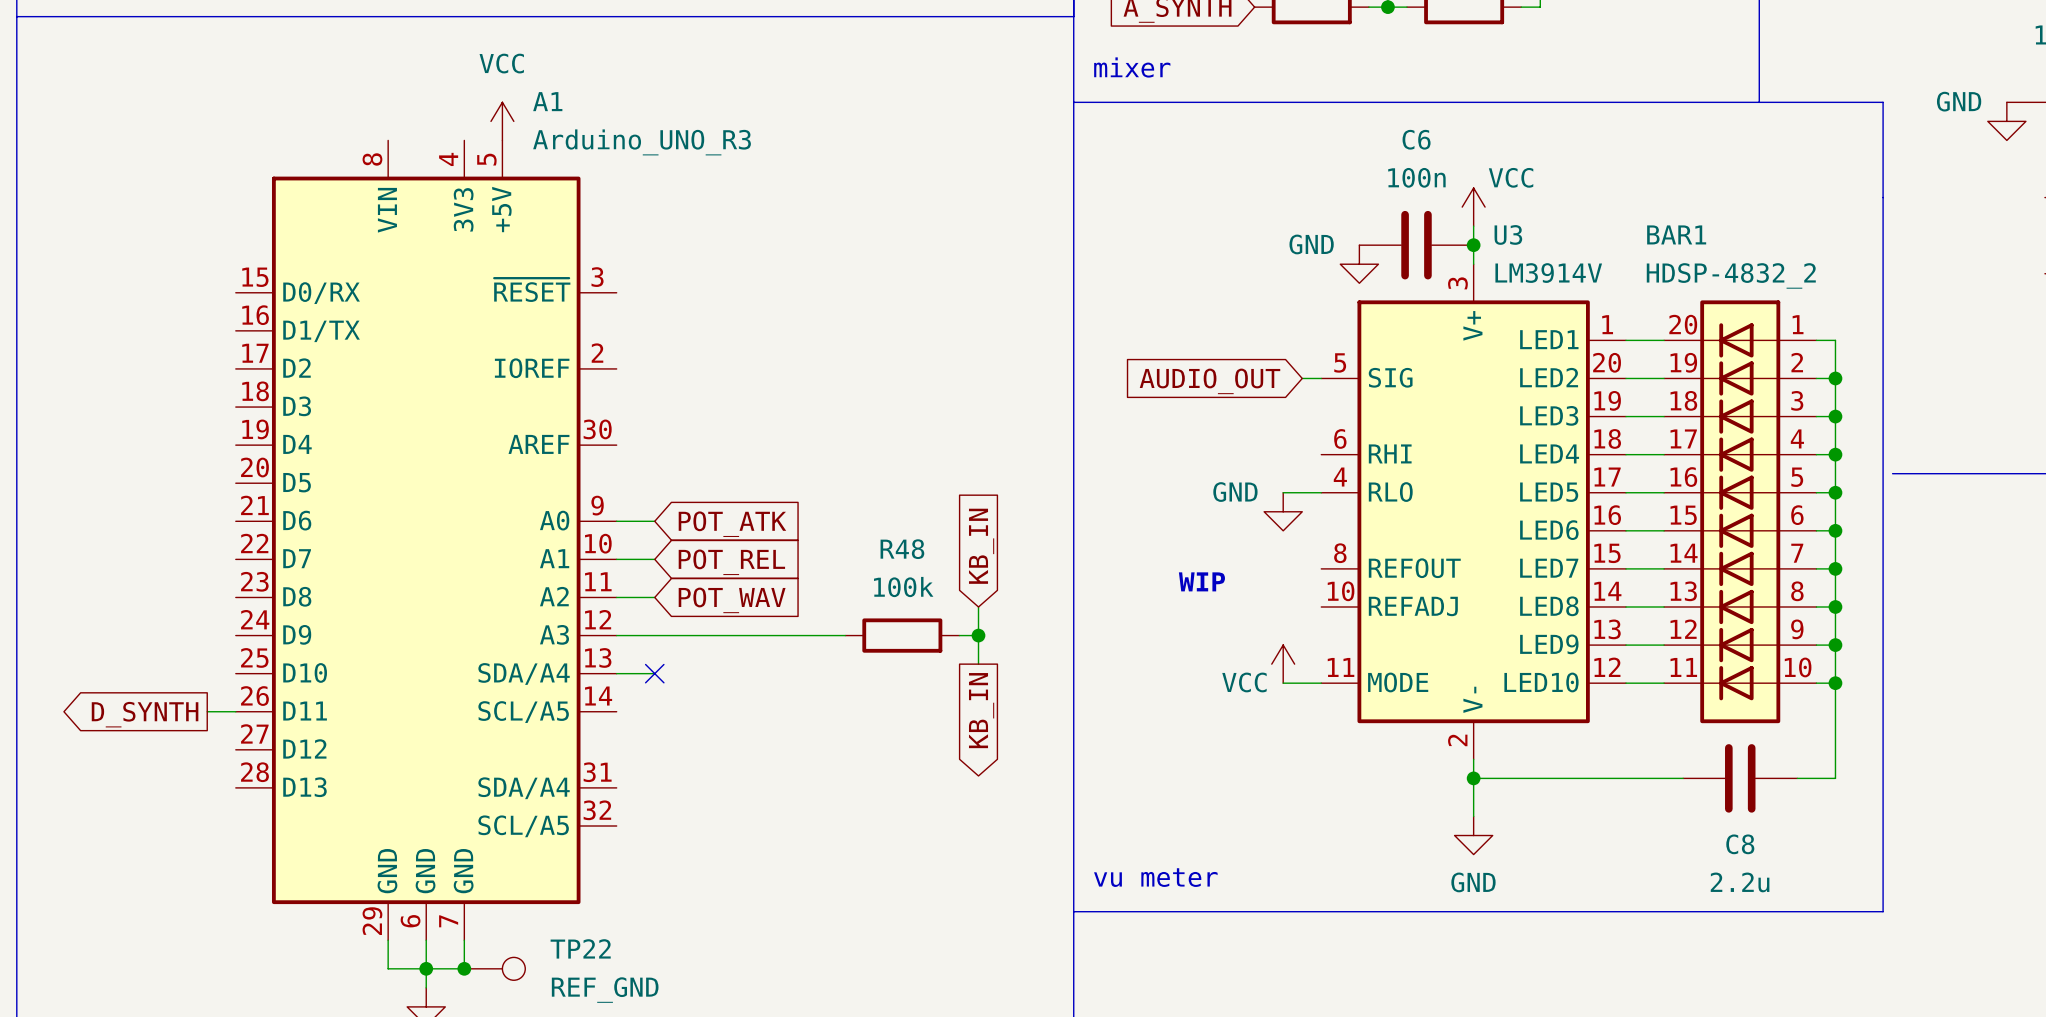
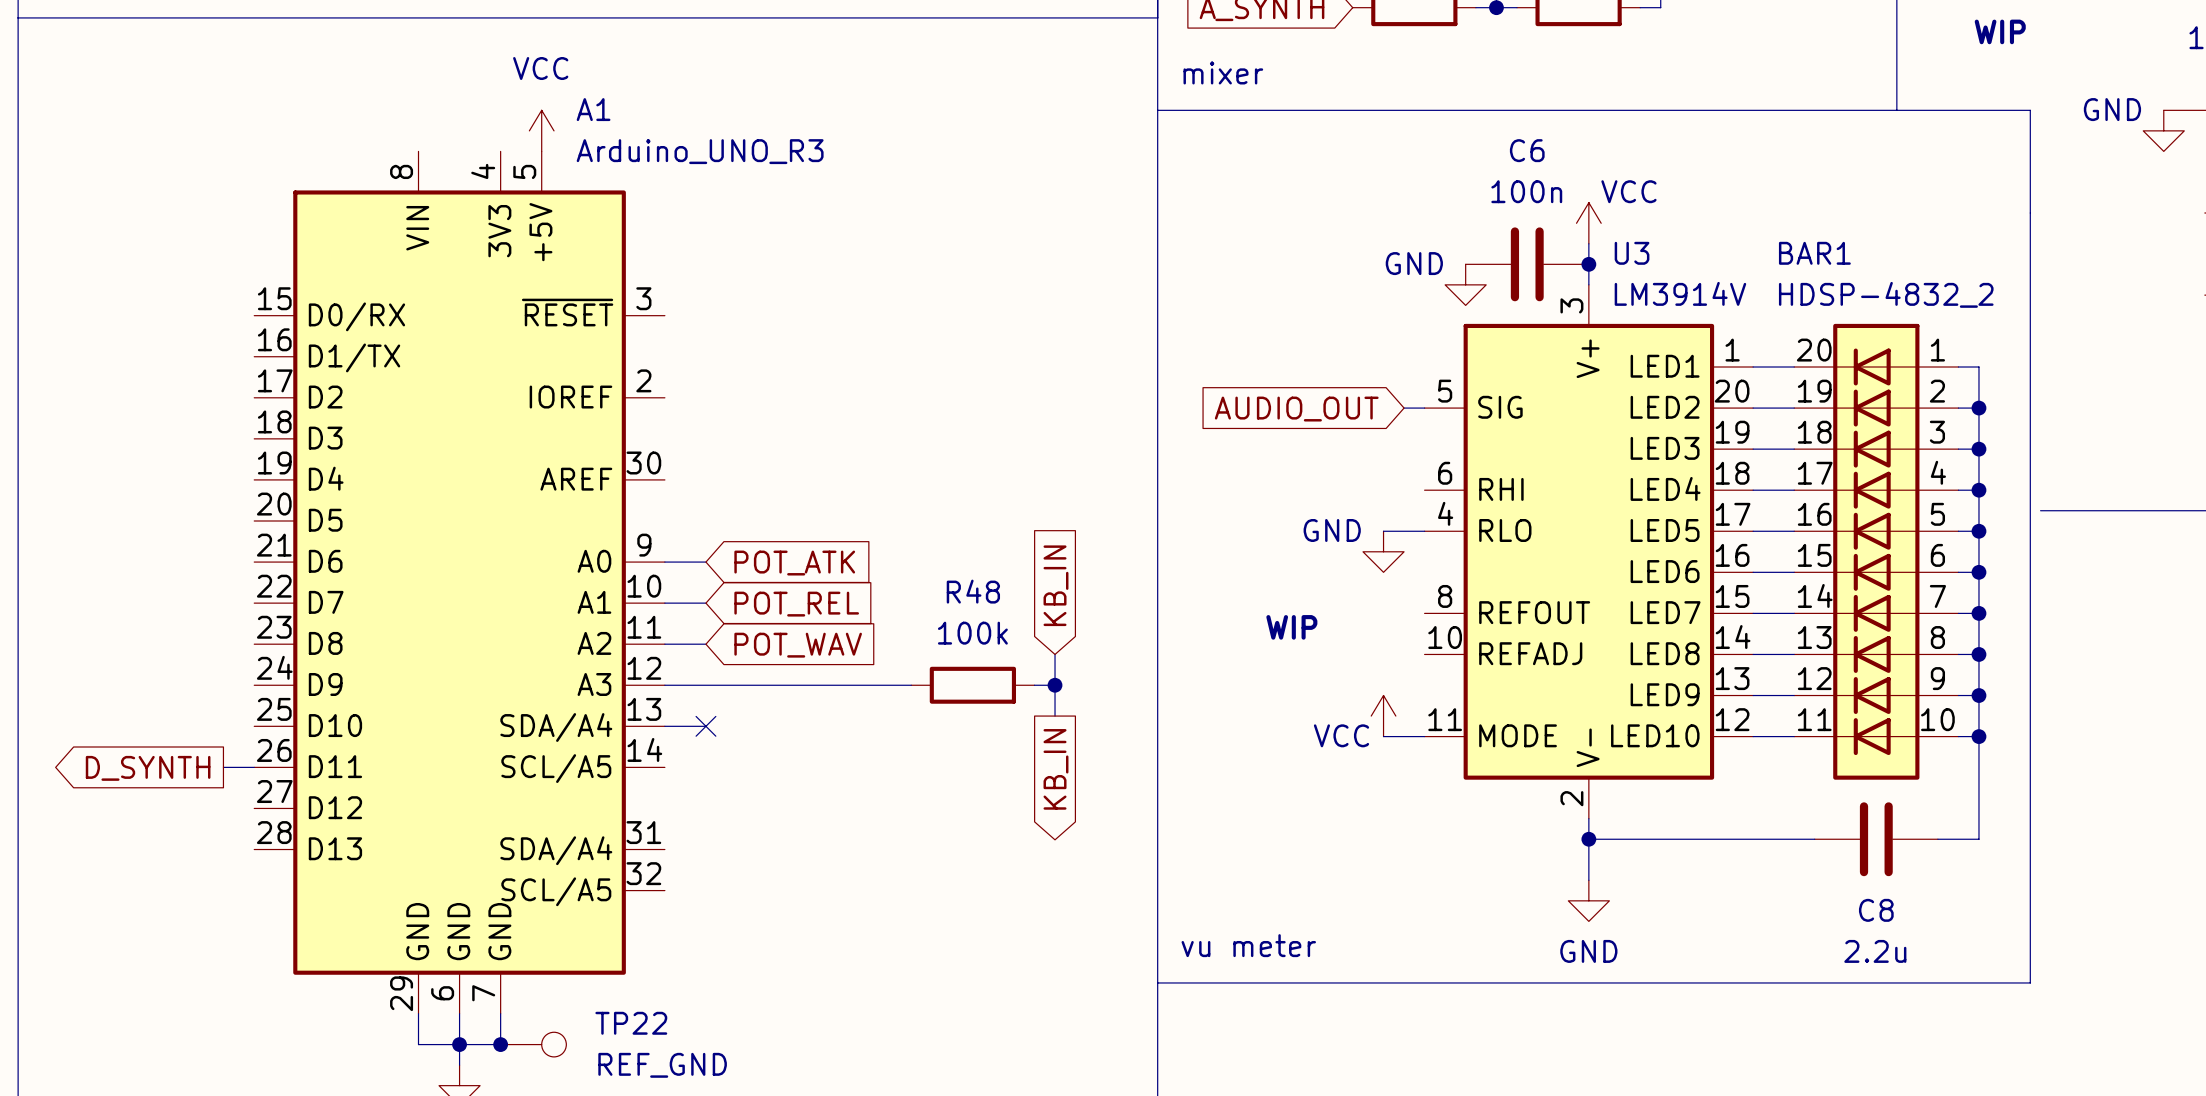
text: none -> WIP (2000, 31)

